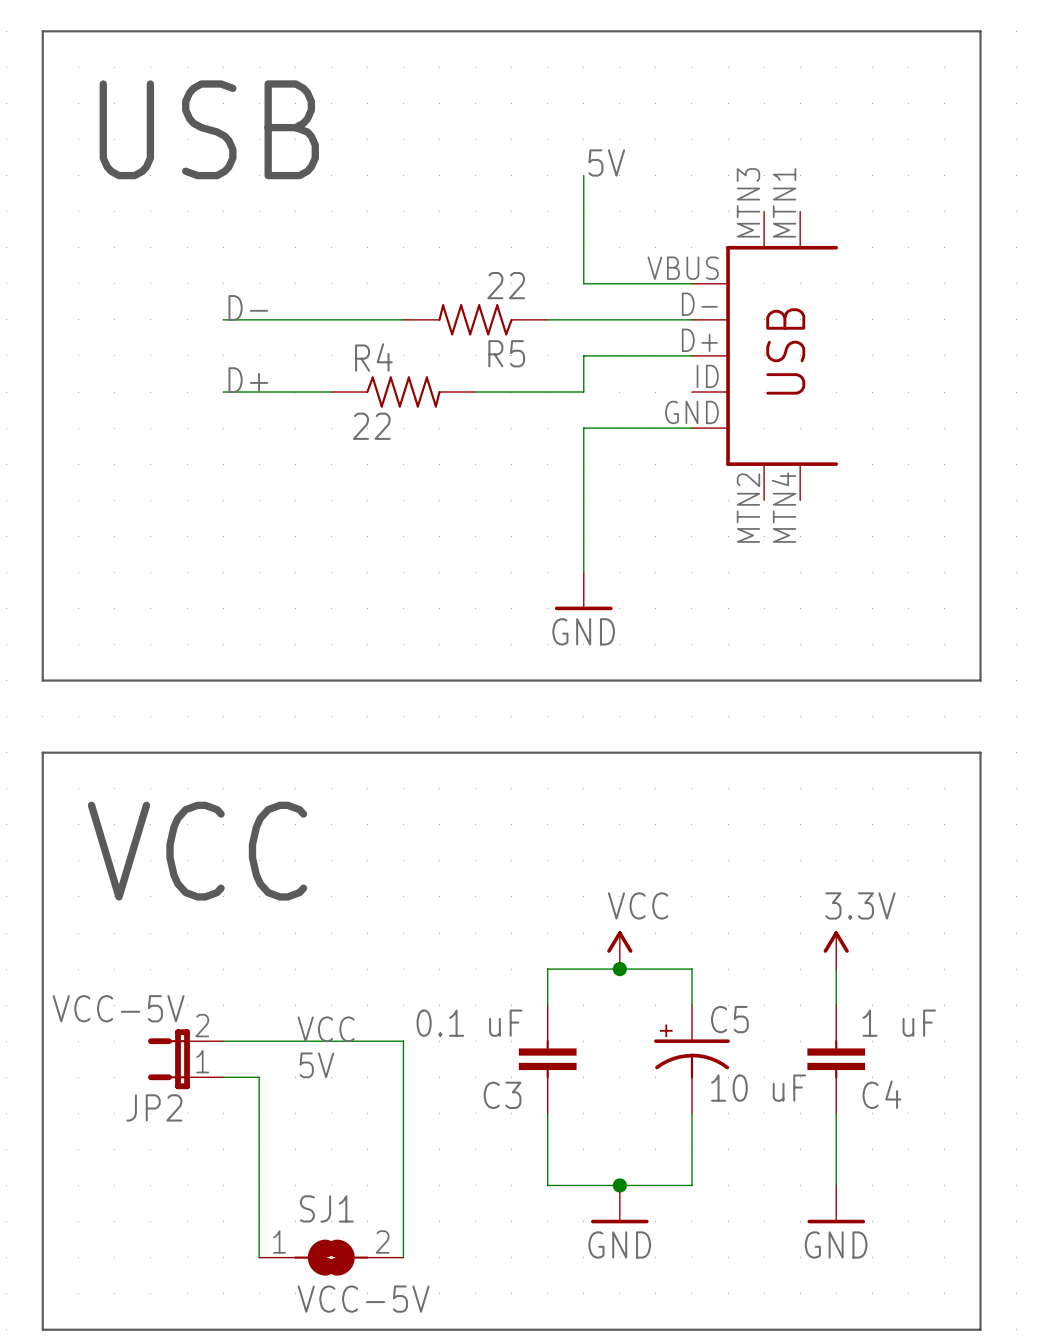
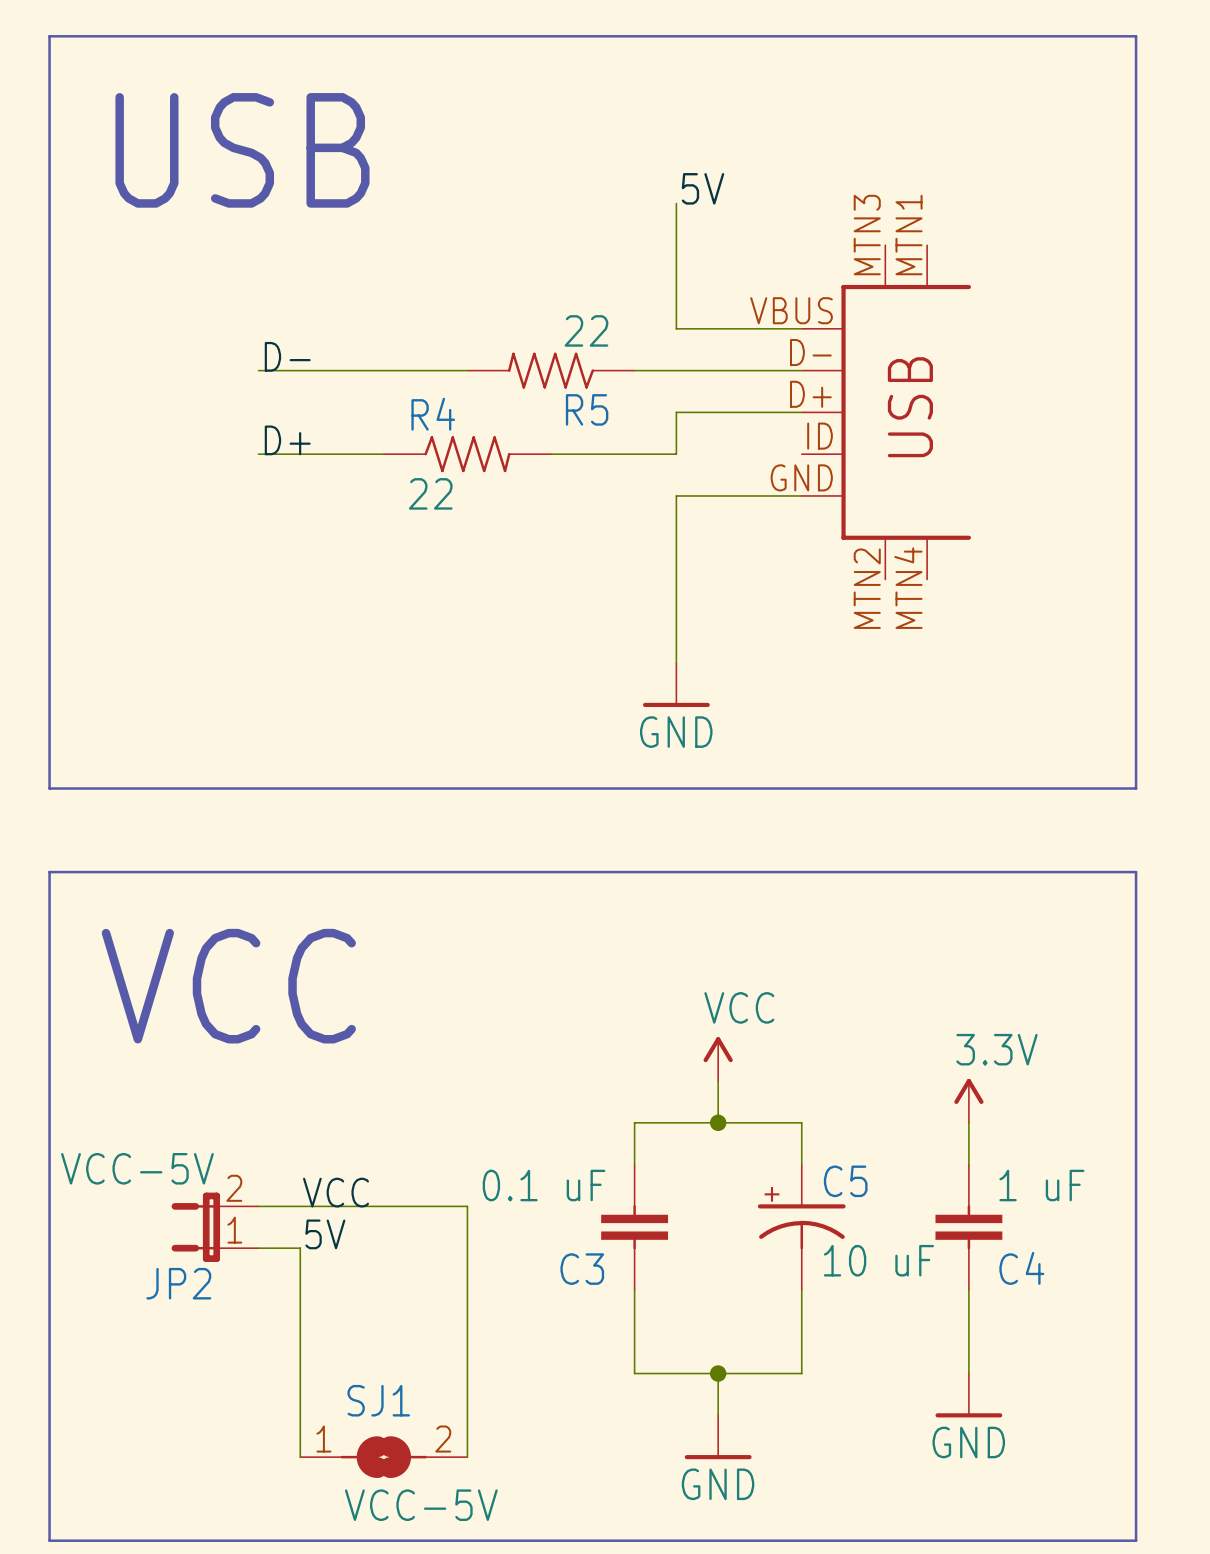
power symbol position: VCC (619, 950) -> VCC (718, 1059)
label position: VCC (326, 1029) -> VCC (336, 1192)
label position: 5V (316, 1065) -> 5V (325, 1234)
power symbol position: GND (619, 1204) -> GND (718, 1437)

